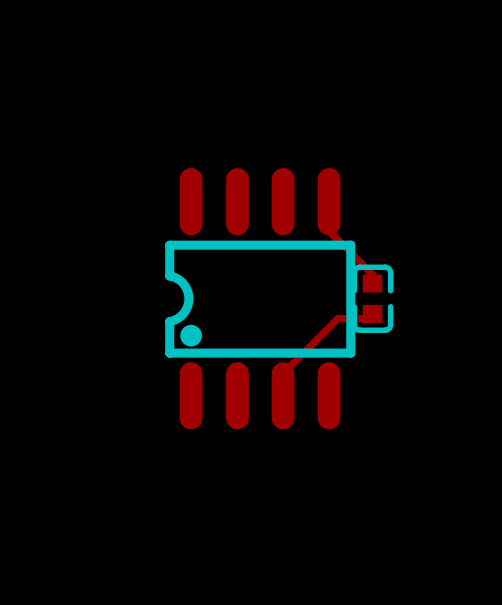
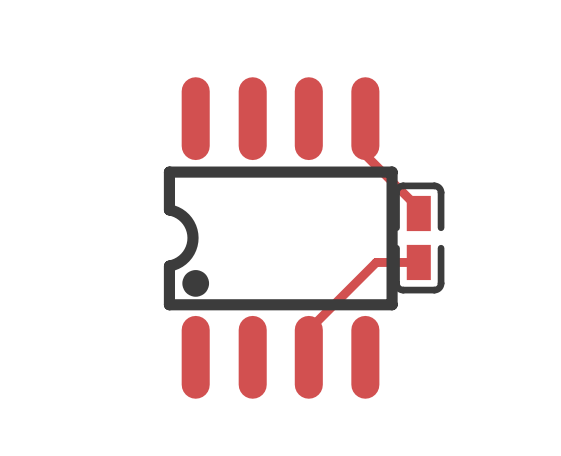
part footprint: [351, 264, 394, 333] -> [393, 182, 445, 294]

